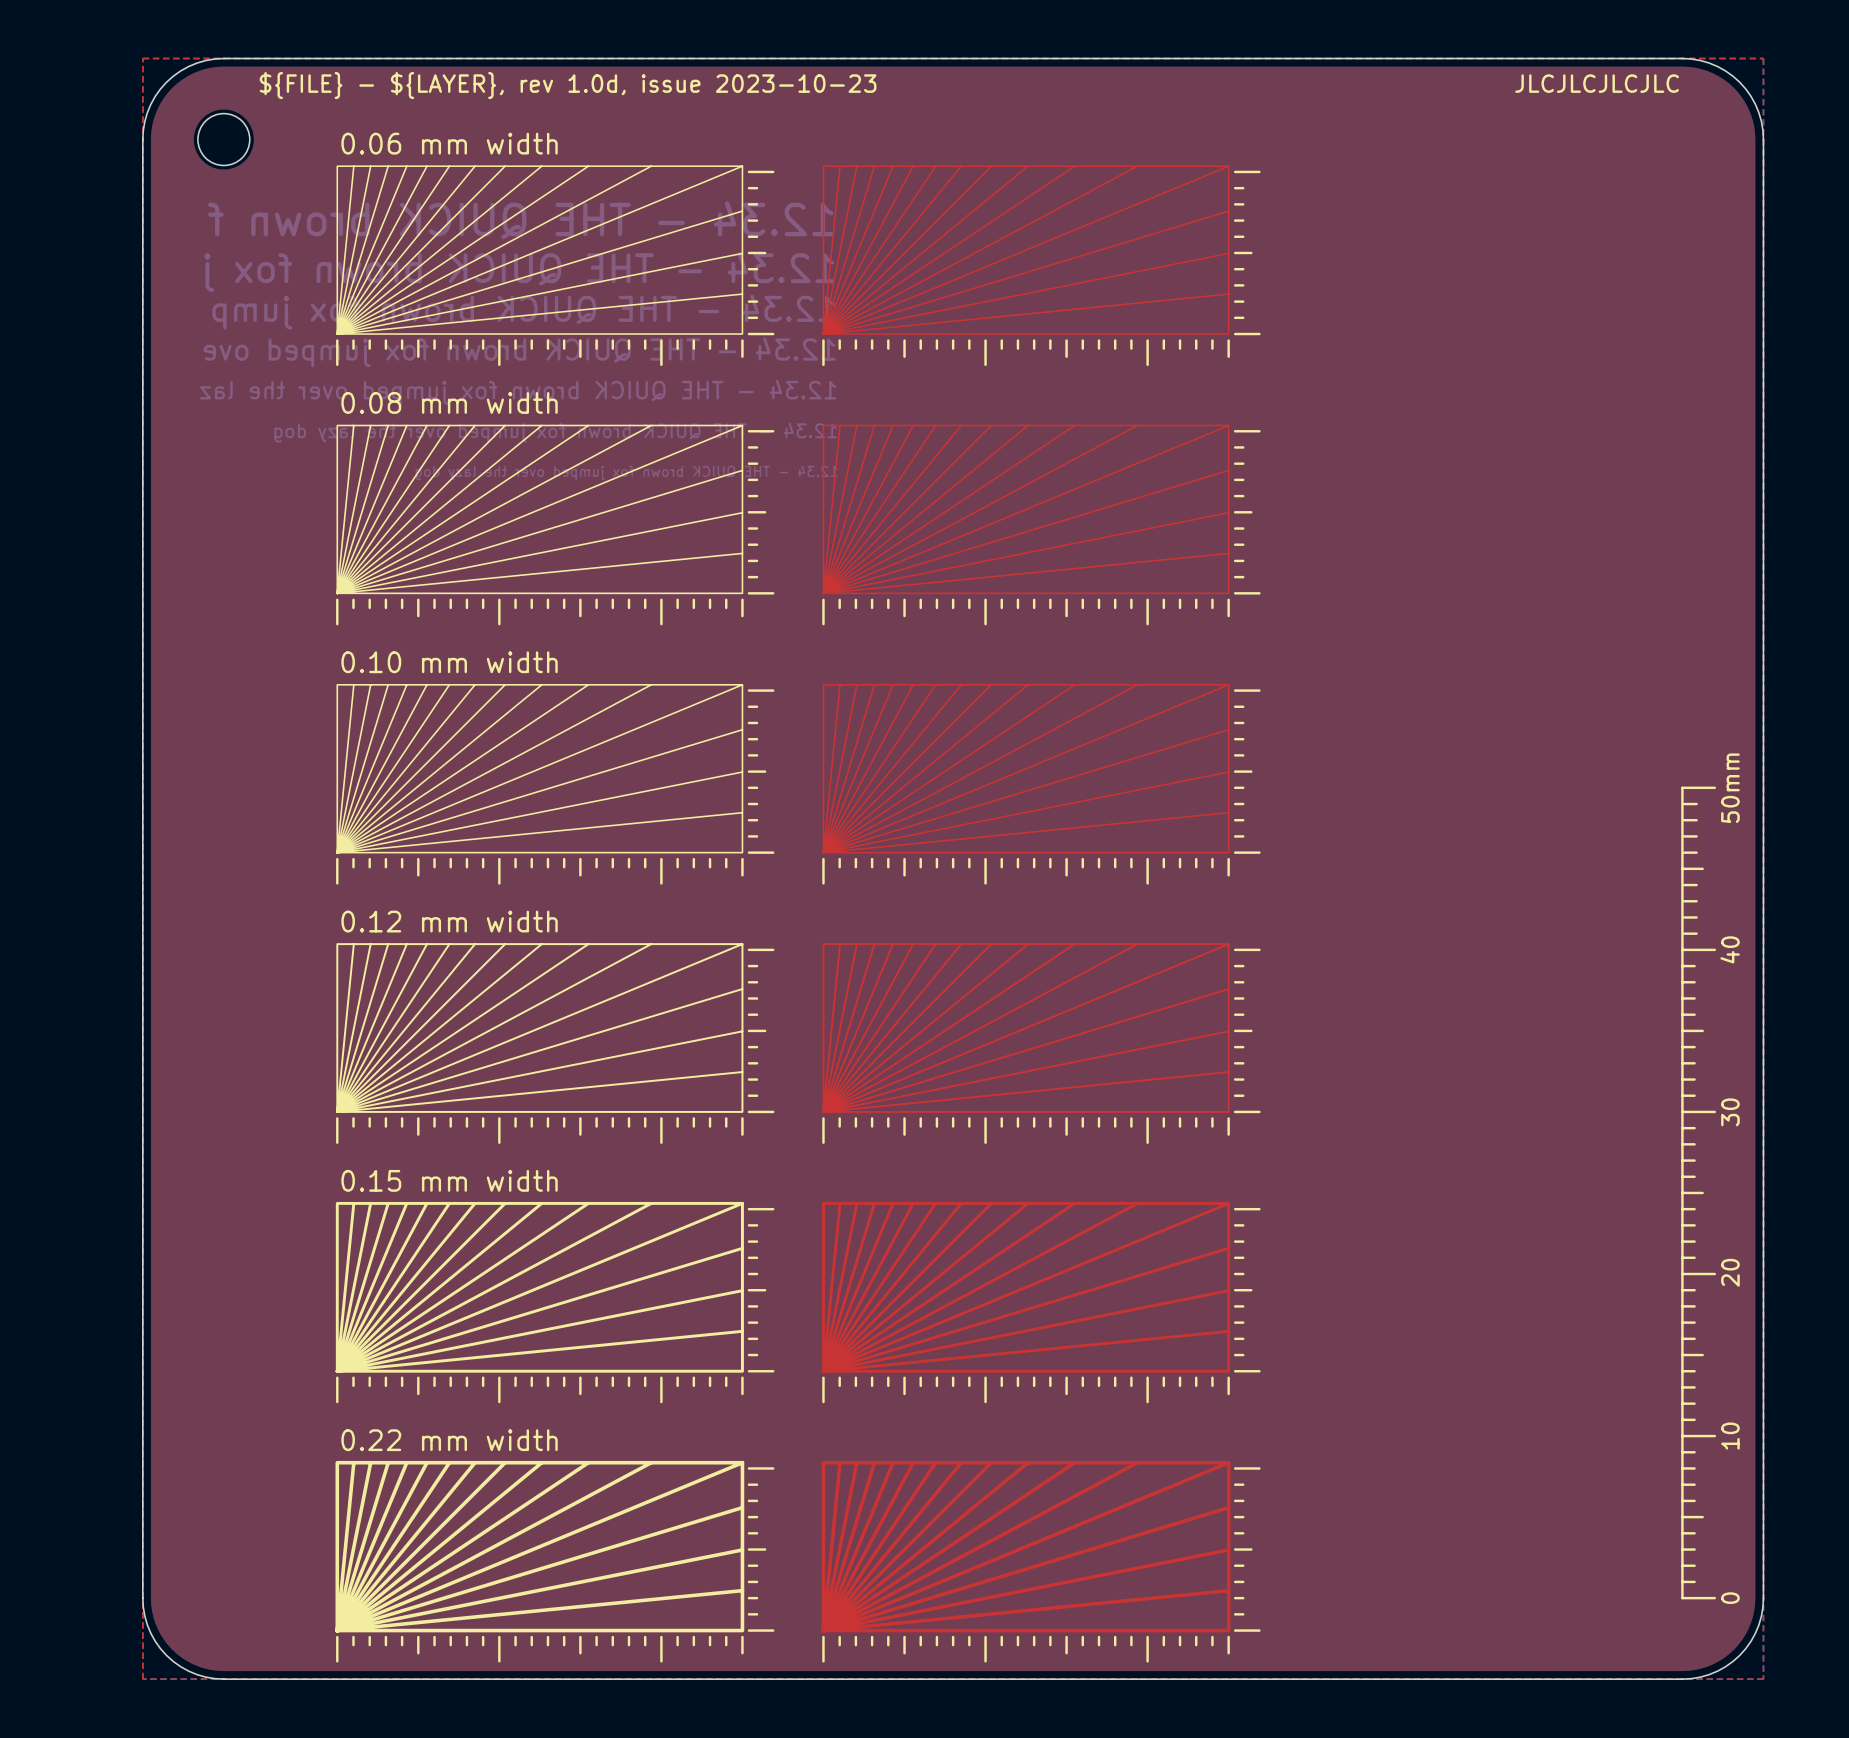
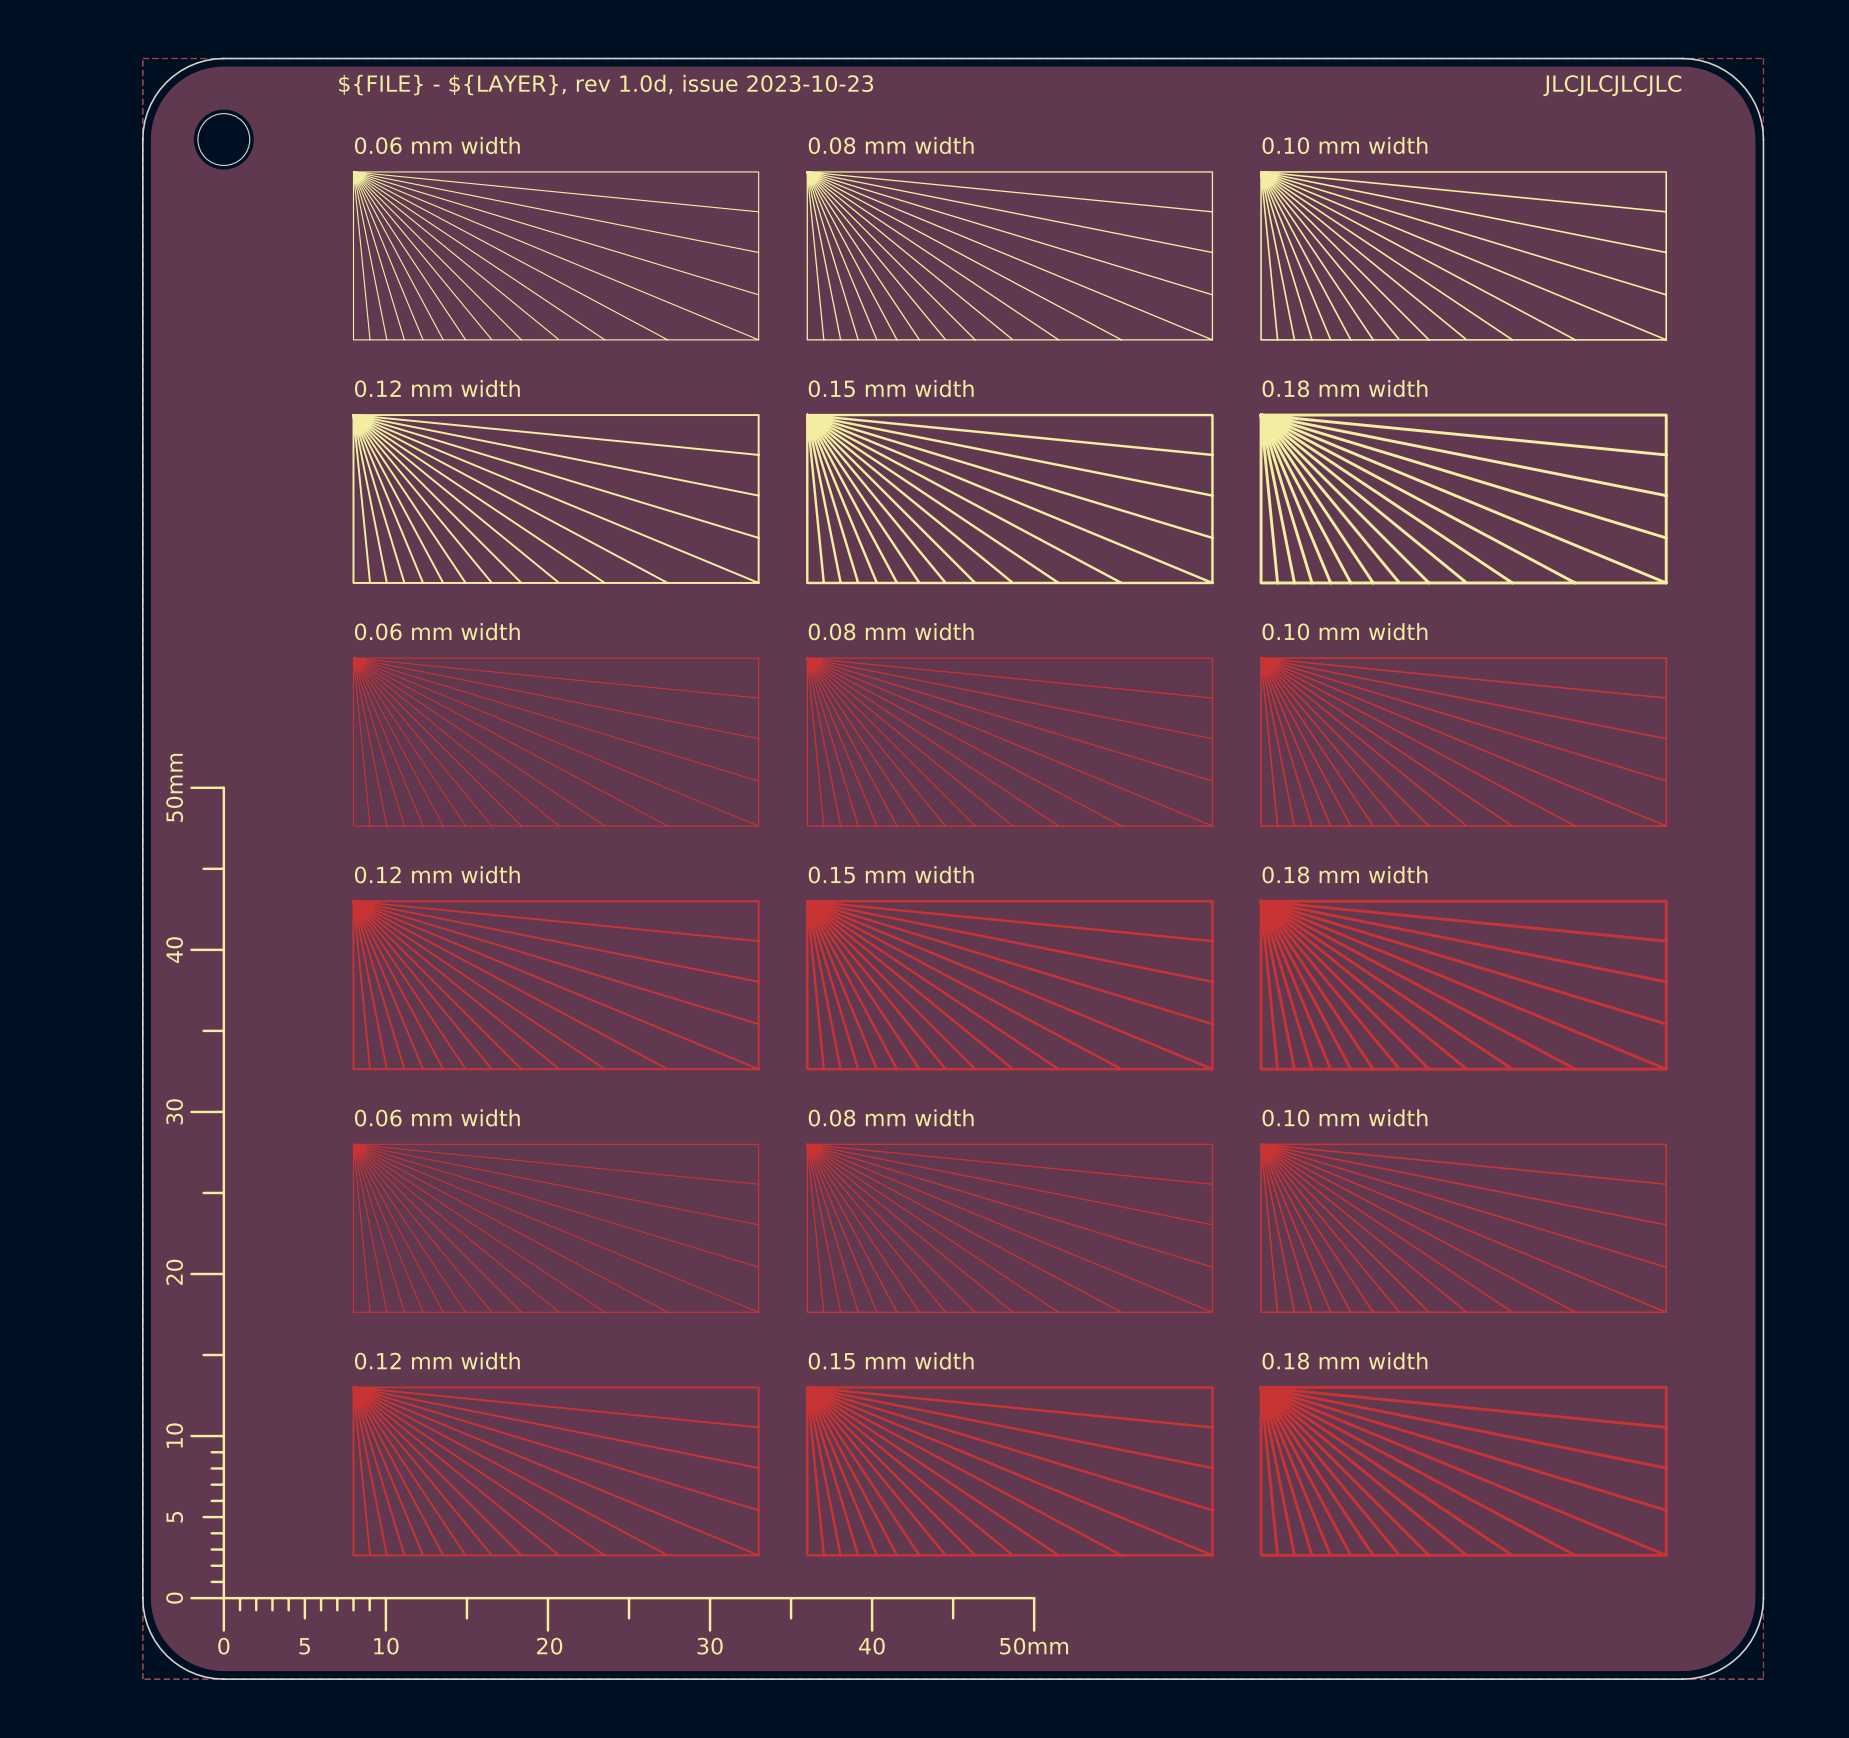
text position: ${FILE} - ${LAYER}, rev 1.0d, issue 2023-10-23 (568, 85) -> ${FILE} - ${LAYER}, rev 1.0d, issue 2023-10-23 (606, 85)
drawing: [335, 165, 1261, 1663] -> none
drawing: none -> [353, 171, 760, 341]
drawing: none -> [806, 171, 1214, 341]
drawing: none -> [1260, 171, 1668, 341]
drawing: none -> [806, 413, 1214, 585]
drawing: none -> [1259, 413, 1668, 585]
drawing: none -> [352, 414, 760, 584]
drawing: none -> [190, 657, 1214, 1632]
drawing: none -> [1260, 657, 1668, 827]
drawing: [1681, 786, 1717, 1600] -> none
drawing: none -> [1259, 899, 1668, 1071]
drawing: none -> [1260, 1143, 1668, 1314]
drawing: none -> [1259, 1385, 1668, 1557]

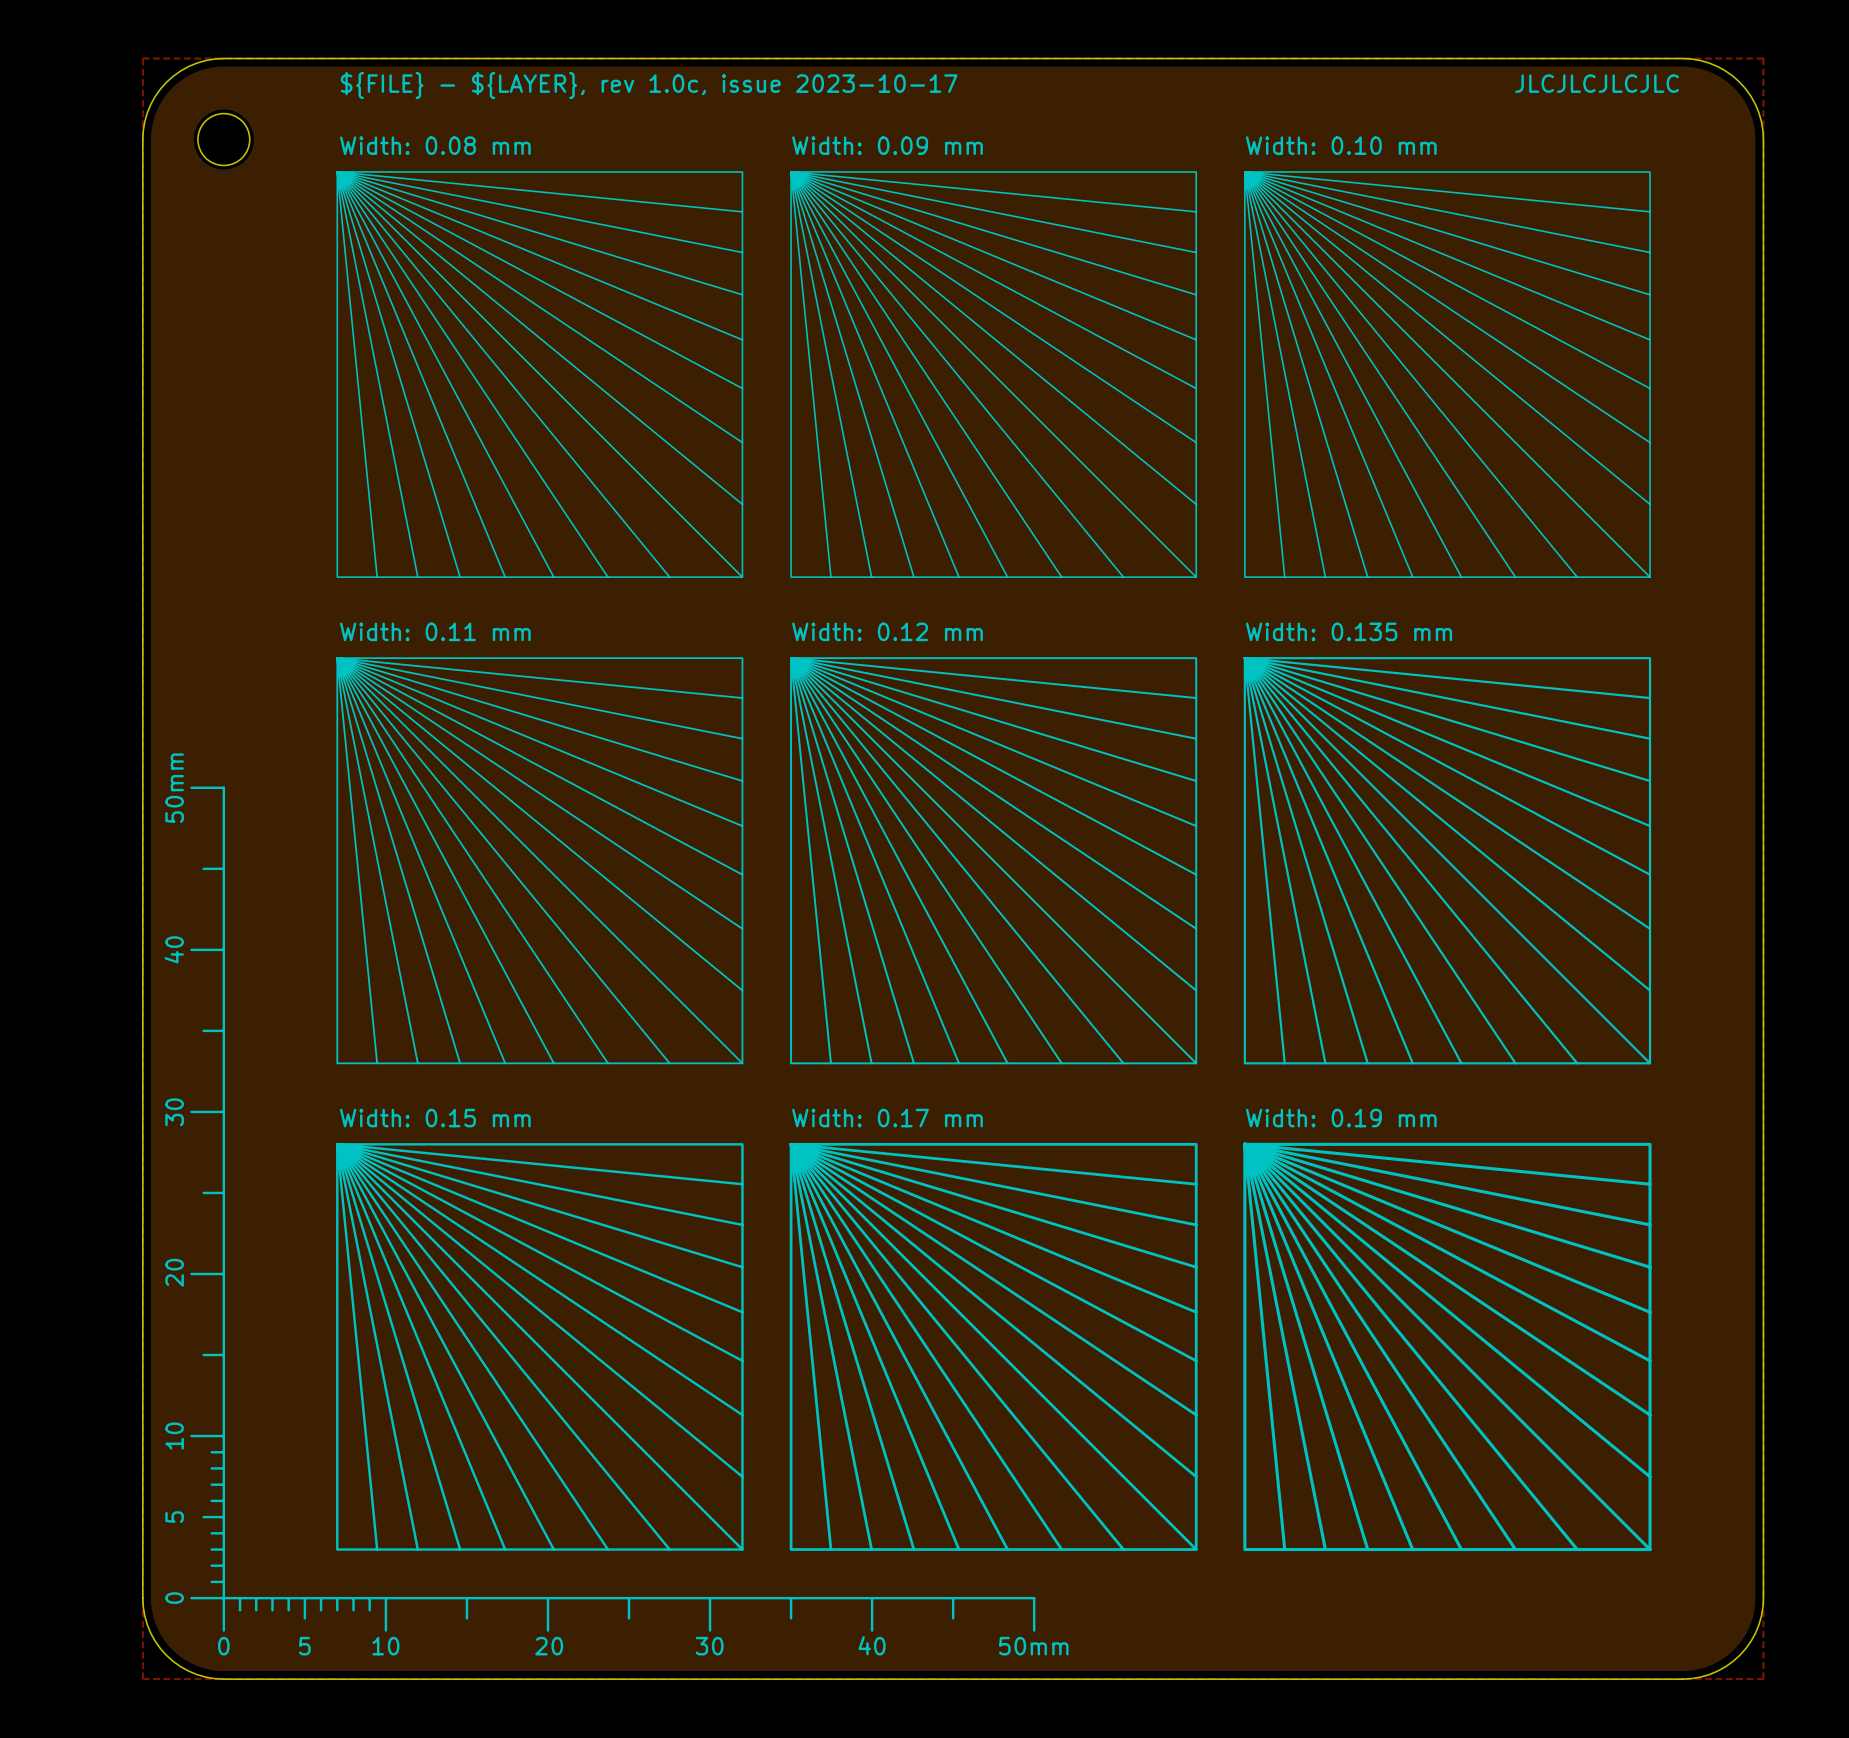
text: ${FILE} - ${LAYER}, rev 1.0d, issue 2023-10-23 (606, 85) -> ${FILE} - ${LAYER}, rev 1.0c, issue 2023-10-17 (649, 85)
drawing: none -> [336, 171, 744, 578]
drawing: [353, 171, 760, 341] -> none
drawing: none -> [790, 171, 1197, 578]
drawing: [806, 171, 1214, 341] -> none
drawing: none -> [1244, 171, 1651, 578]
drawing: [1260, 171, 1668, 341] -> none
drawing: [806, 413, 1214, 585] -> none
drawing: [1259, 413, 1668, 585] -> none
drawing: [352, 414, 760, 584] -> none
drawing: none -> [336, 657, 744, 1065]
drawing: [353, 657, 760, 827] -> none
drawing: none -> [790, 657, 1198, 1065]
drawing: [806, 657, 1214, 827] -> none
drawing: none -> [1243, 657, 1652, 1065]
drawing: [1260, 657, 1668, 827] -> none
drawing: [1259, 899, 1668, 1071] -> none
drawing: [352, 900, 760, 1071] -> none
drawing: [806, 900, 1214, 1071] -> none
drawing: none -> [789, 1142, 1198, 1551]
drawing: none -> [1243, 1142, 1652, 1552]
drawing: none -> [336, 1143, 744, 1551]
drawing: [353, 1143, 760, 1313] -> none
drawing: [806, 1143, 1214, 1313] -> none
drawing: [1260, 1143, 1668, 1314] -> none
drawing: [1259, 1385, 1668, 1557] -> none
drawing: [352, 1386, 760, 1557] -> none
drawing: [806, 1386, 1214, 1557] -> none

